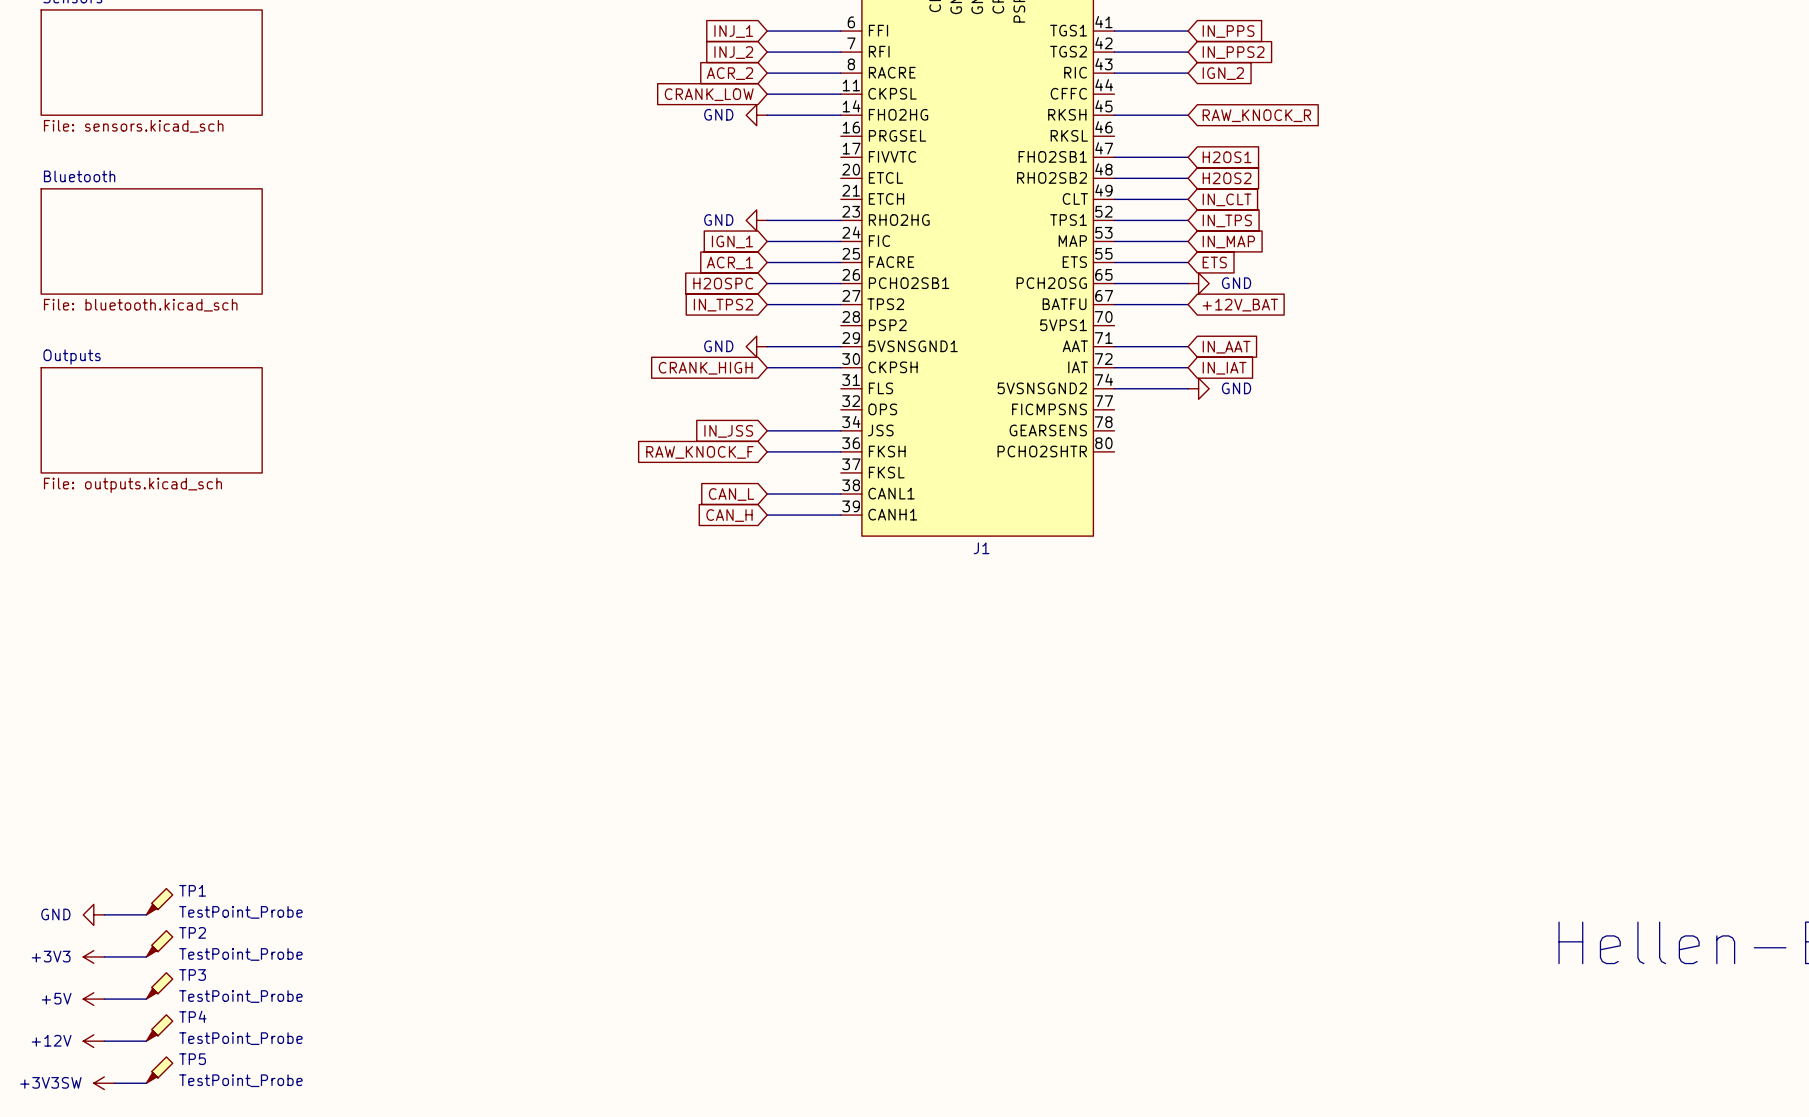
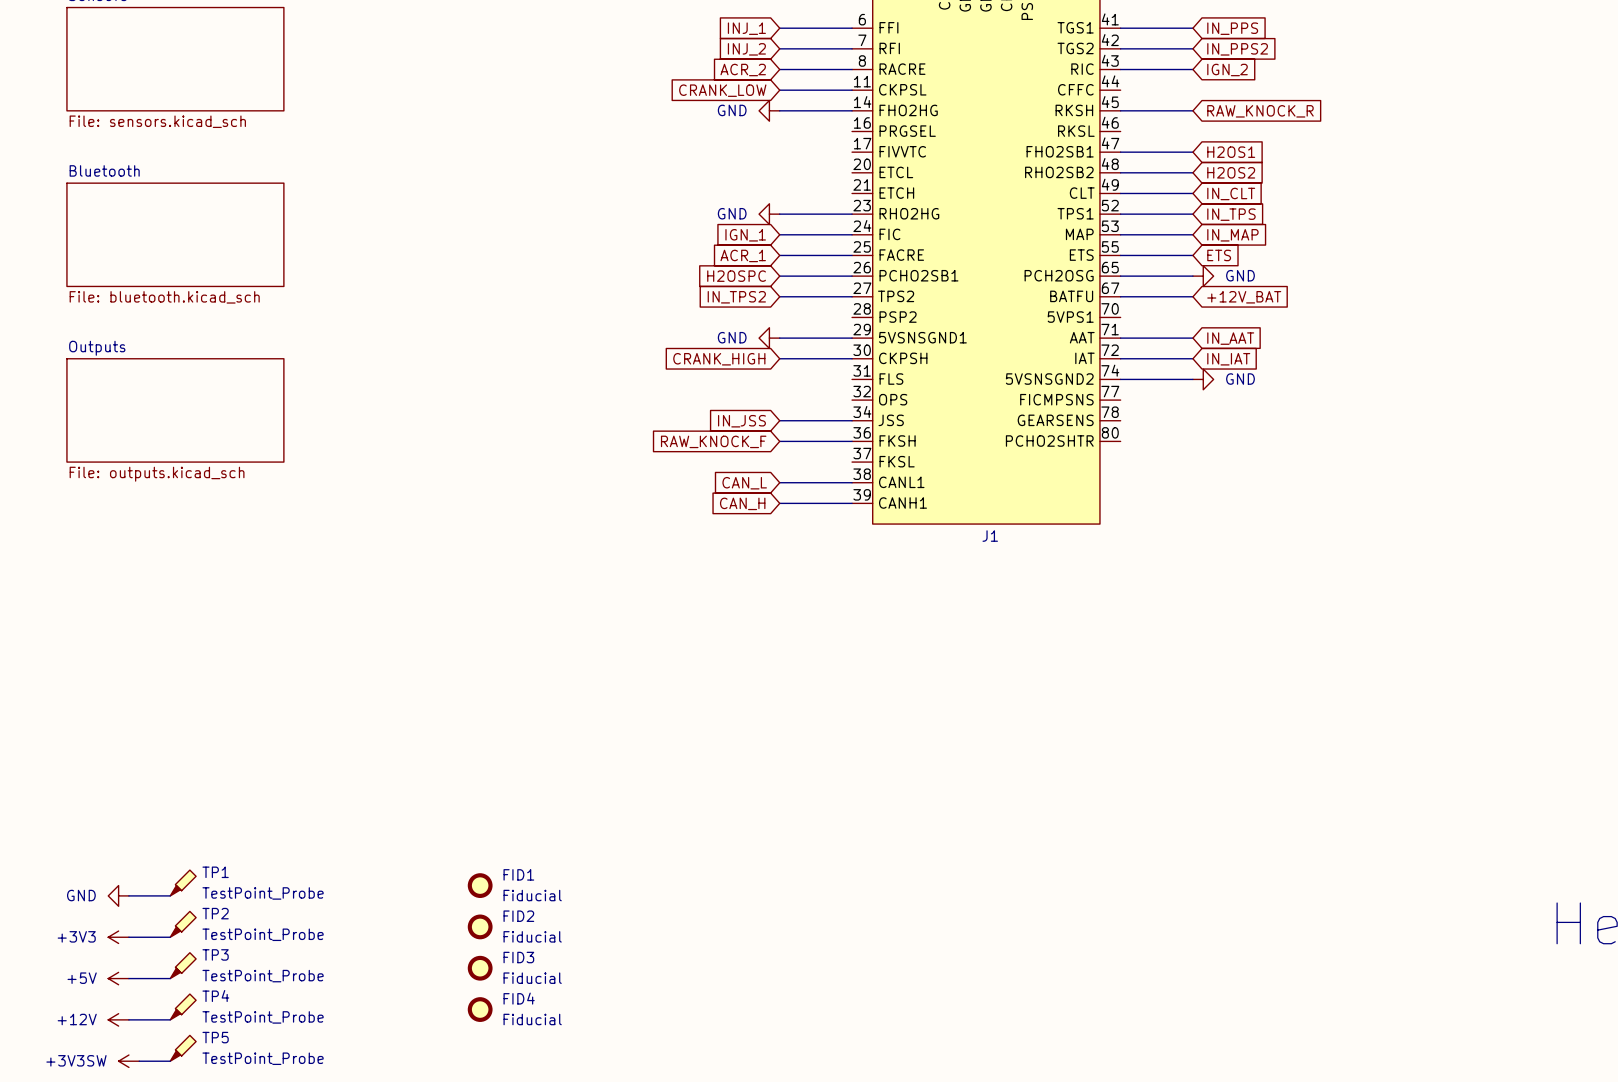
FID1: none -> Fiducial (480, 885)
FID2: none -> Fiducial (480, 926)
FID3: none -> Fiducial (480, 968)
FID4: none -> Fiducial (480, 1009)

